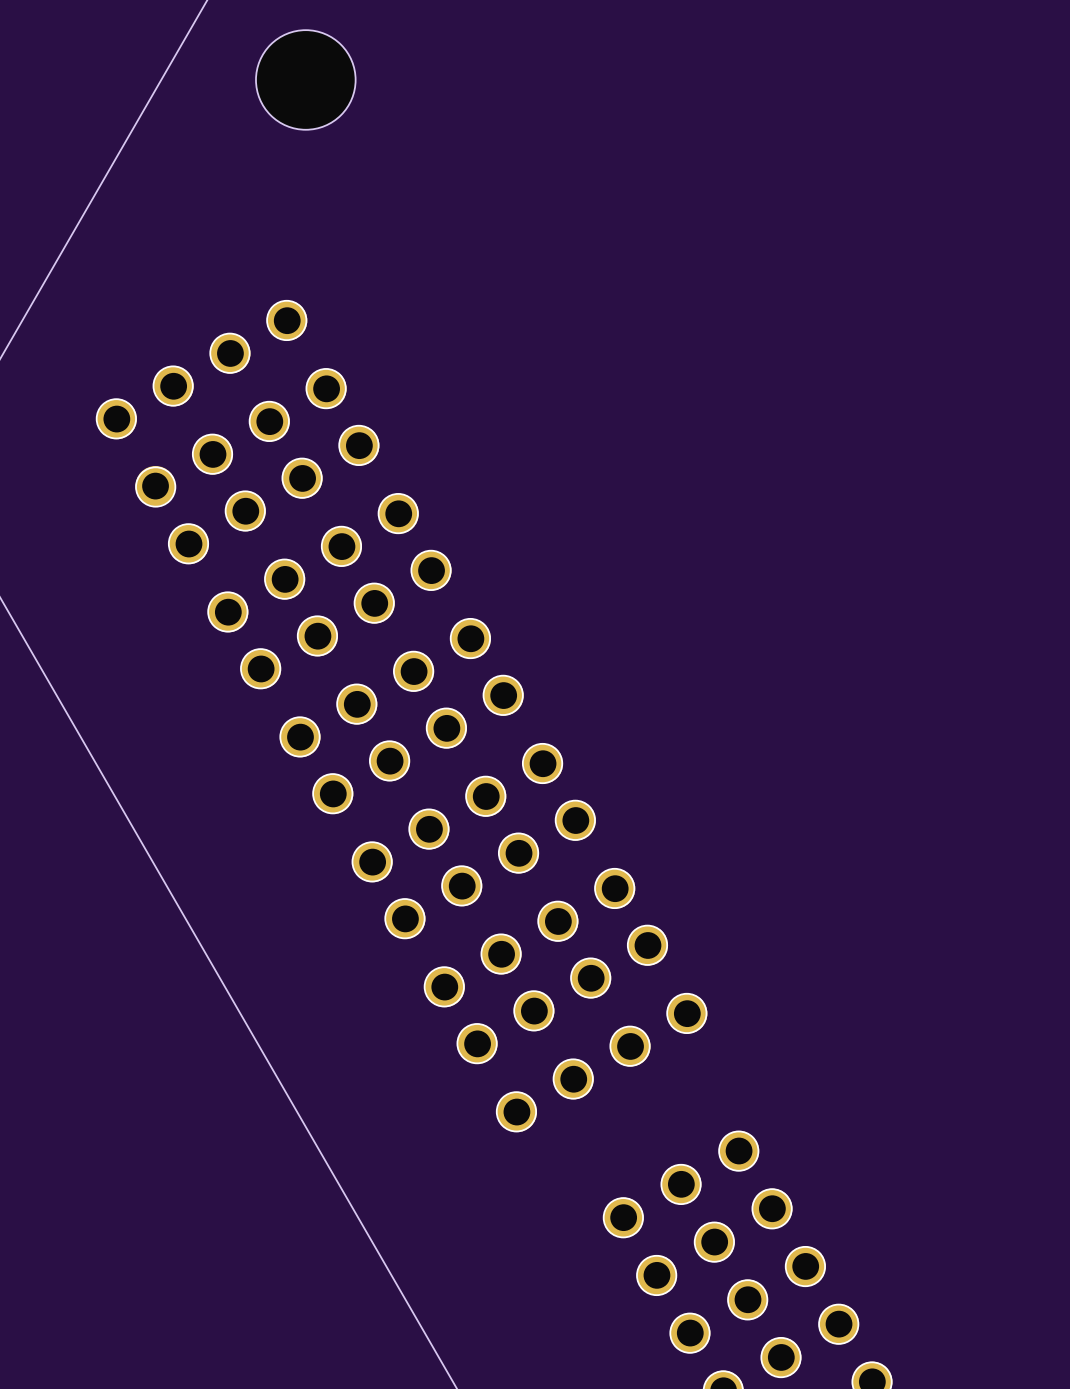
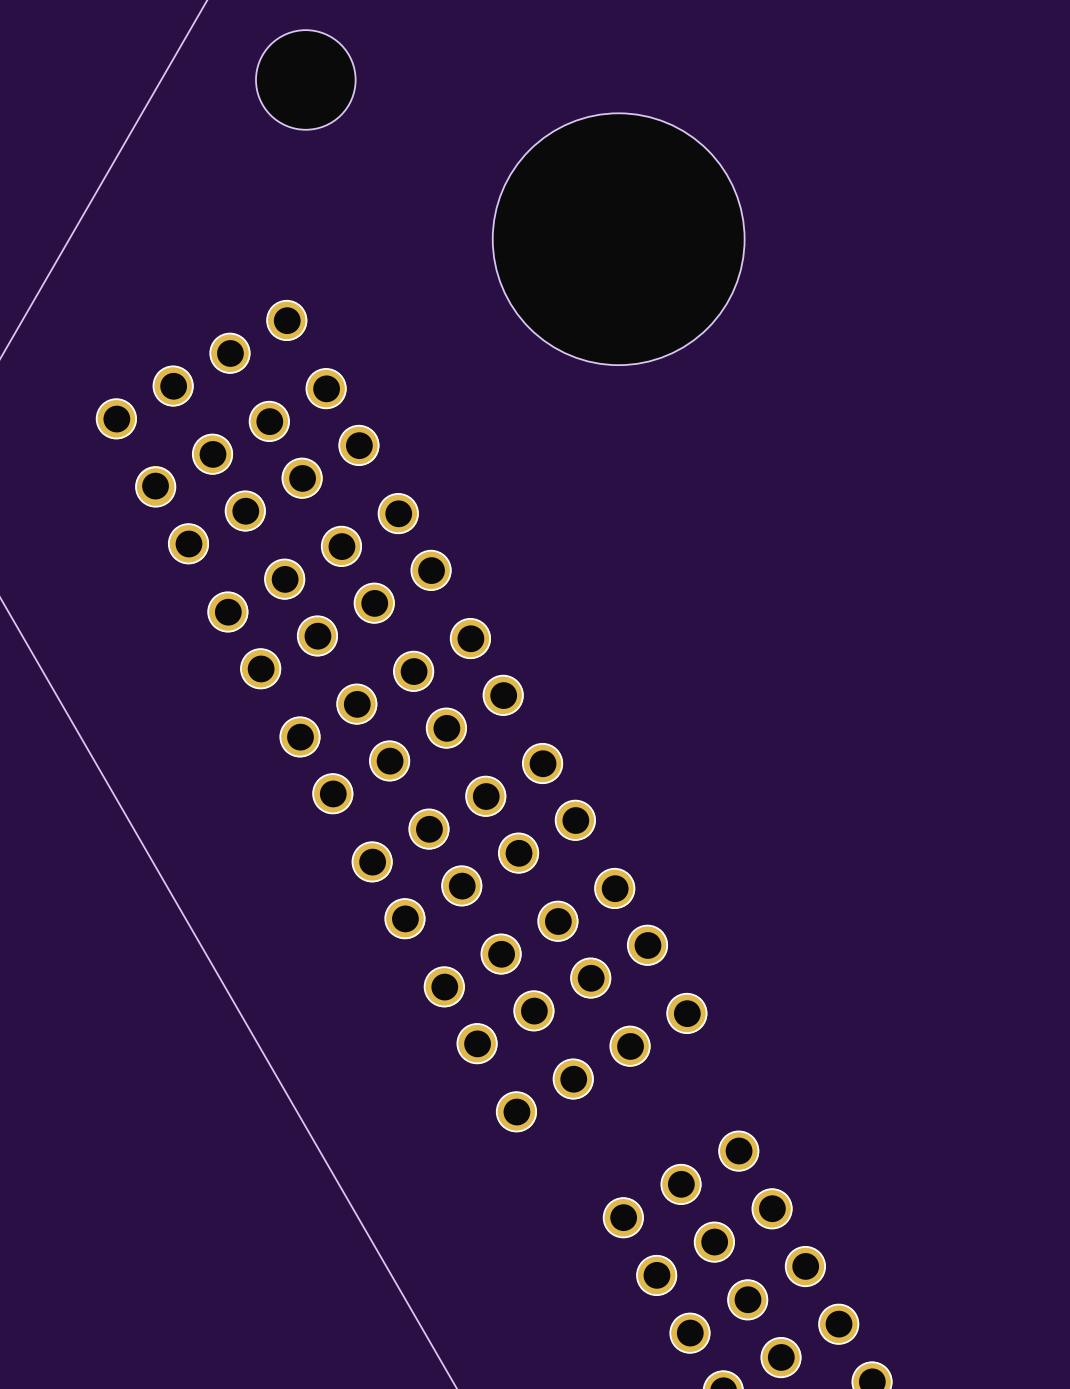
hole: none -> (618, 239)

